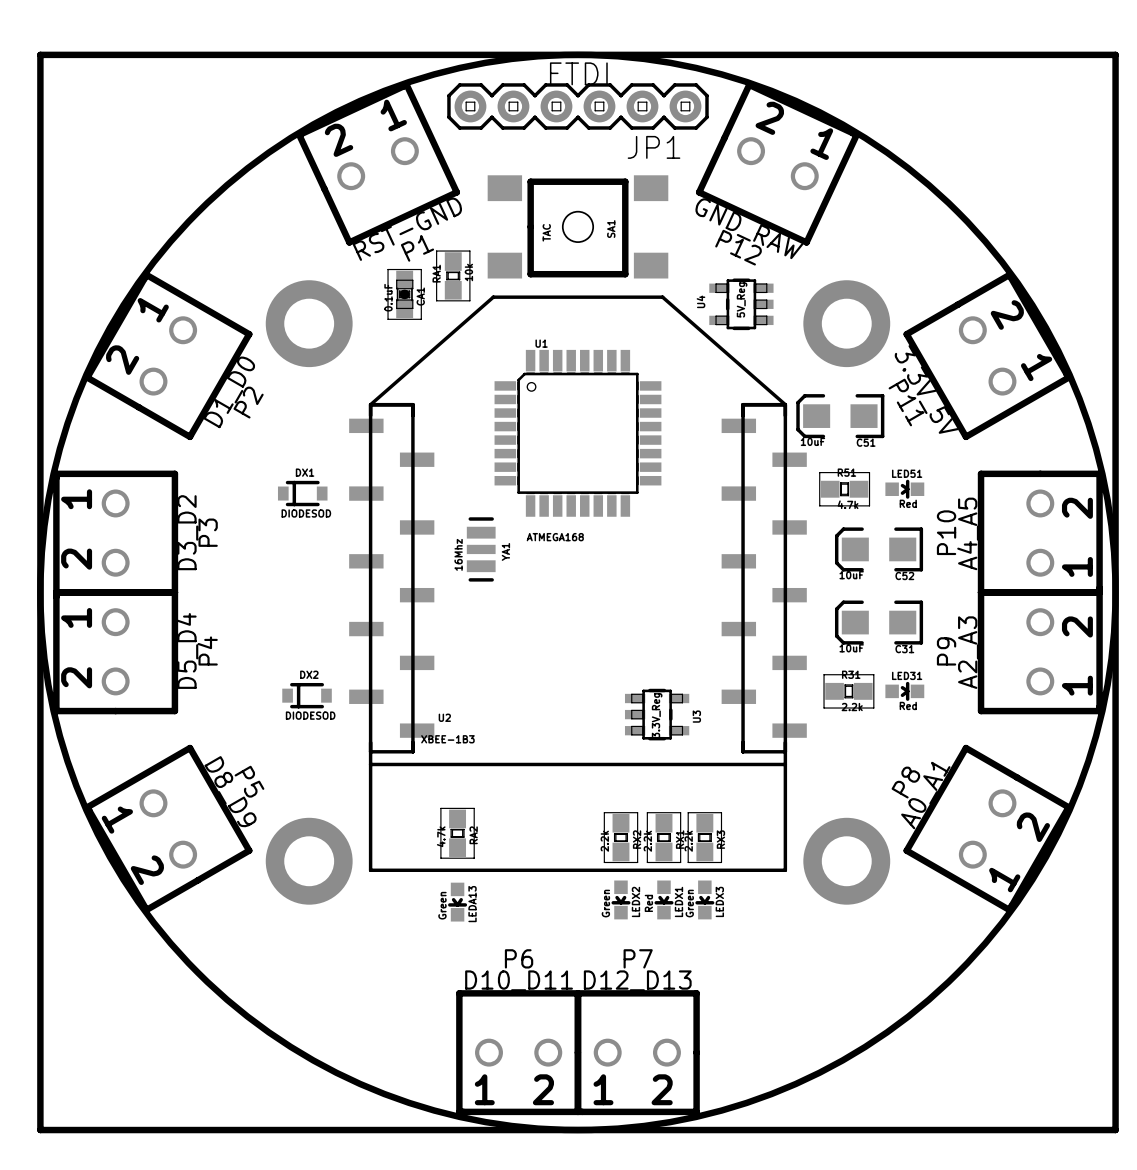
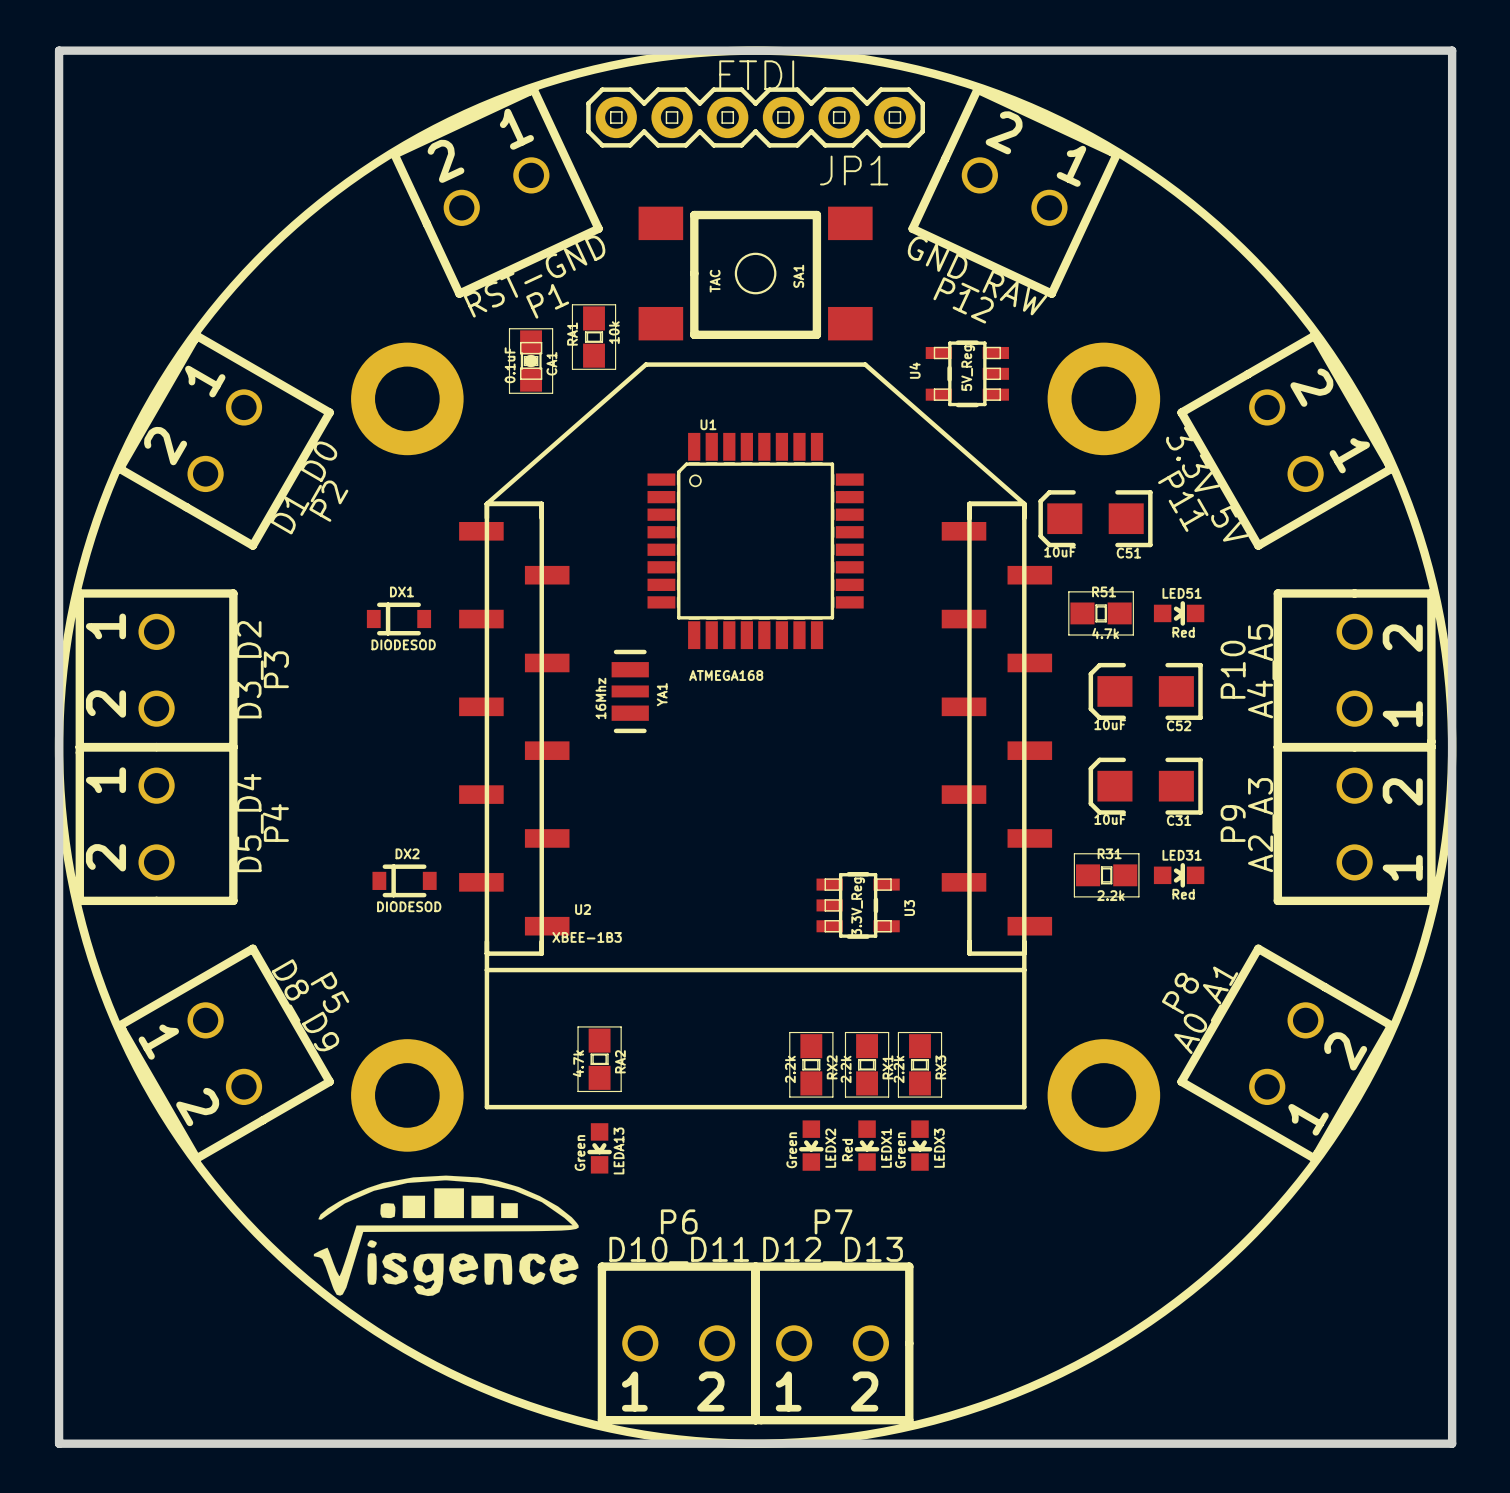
drawing: none -> [313, 1175, 579, 1297]

